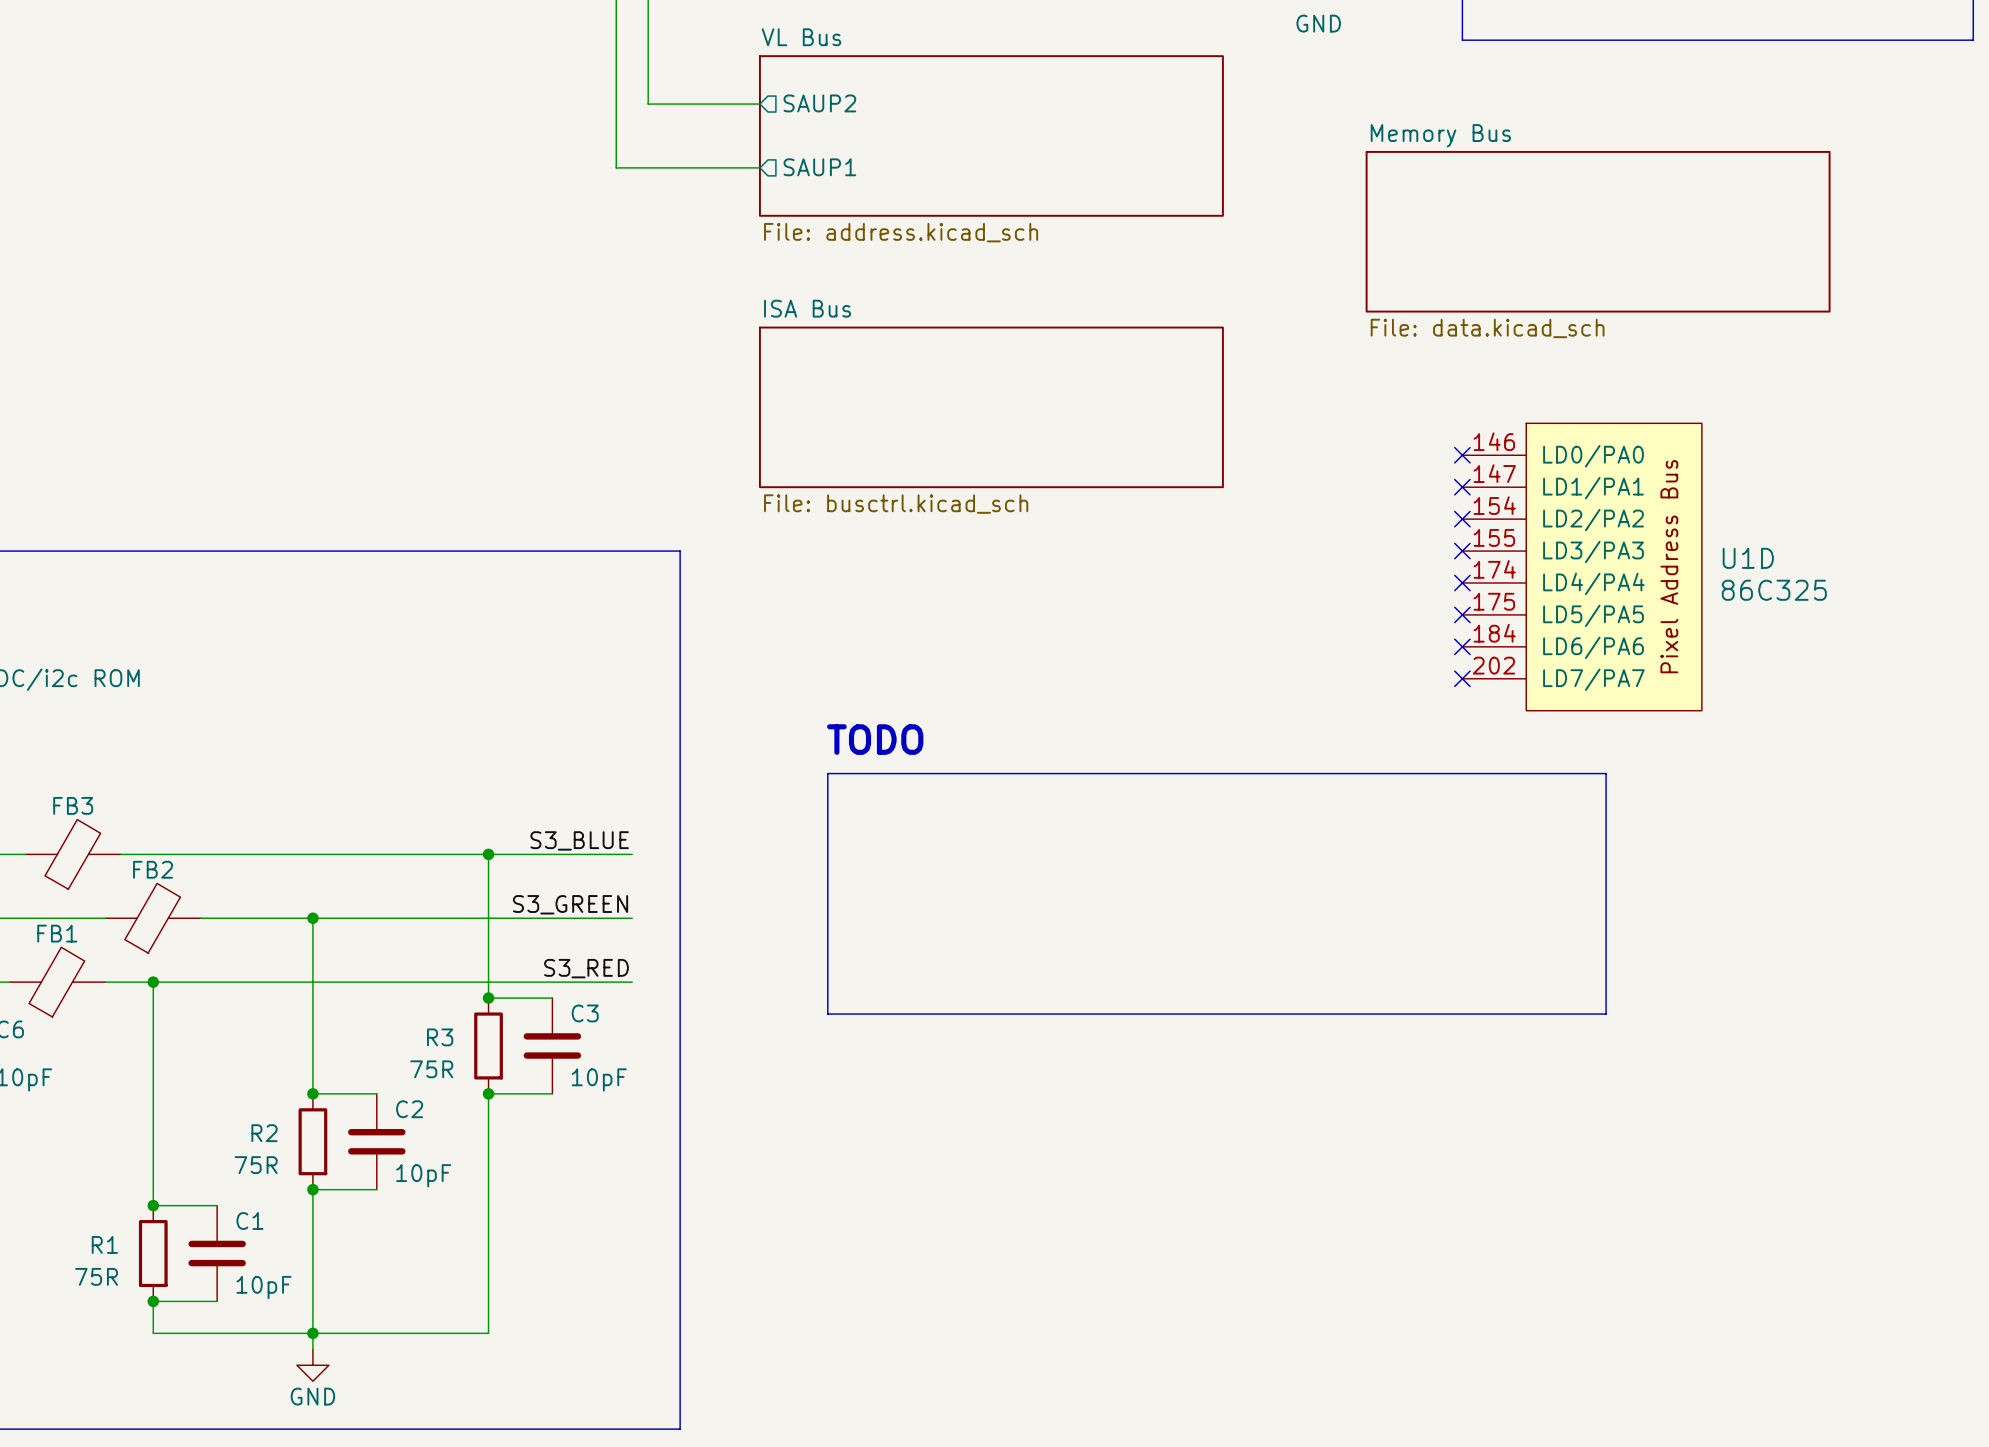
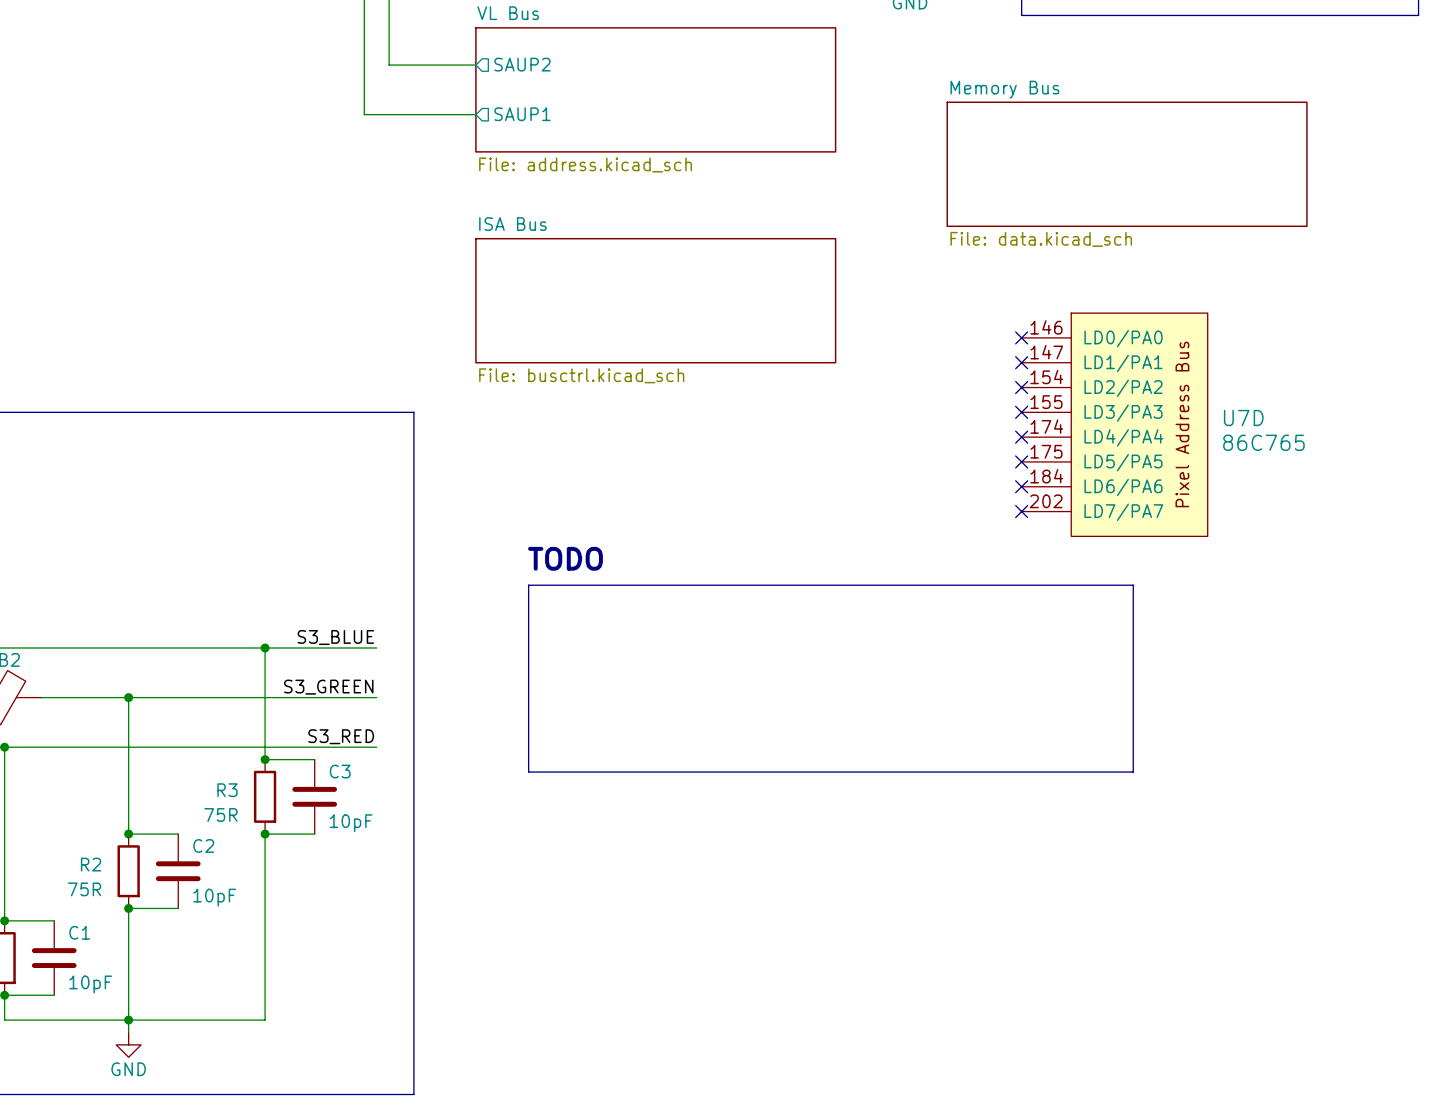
U1D name: U1D (1748, 558) -> U7D (1243, 417)
U1D value: 86C325 (1774, 590) -> 86C765 (1263, 442)

